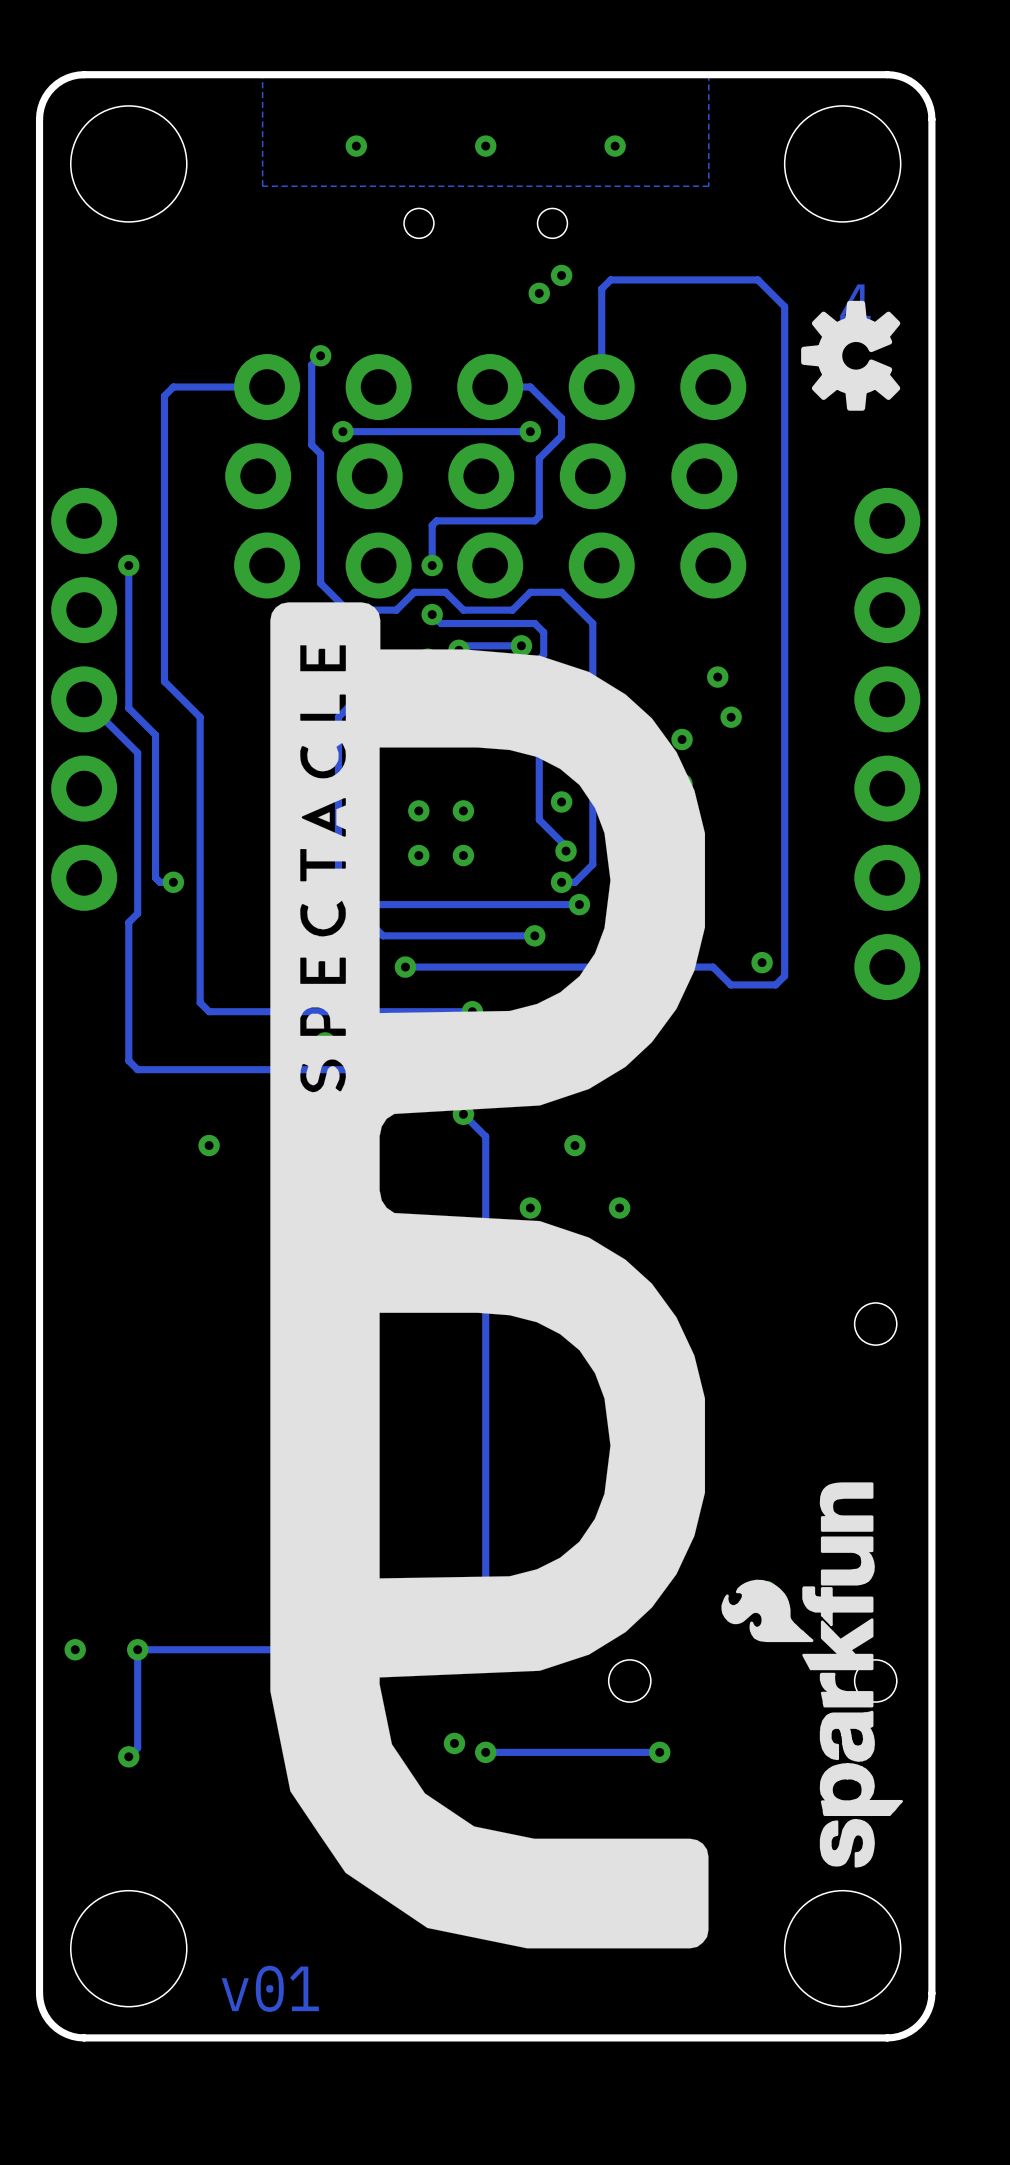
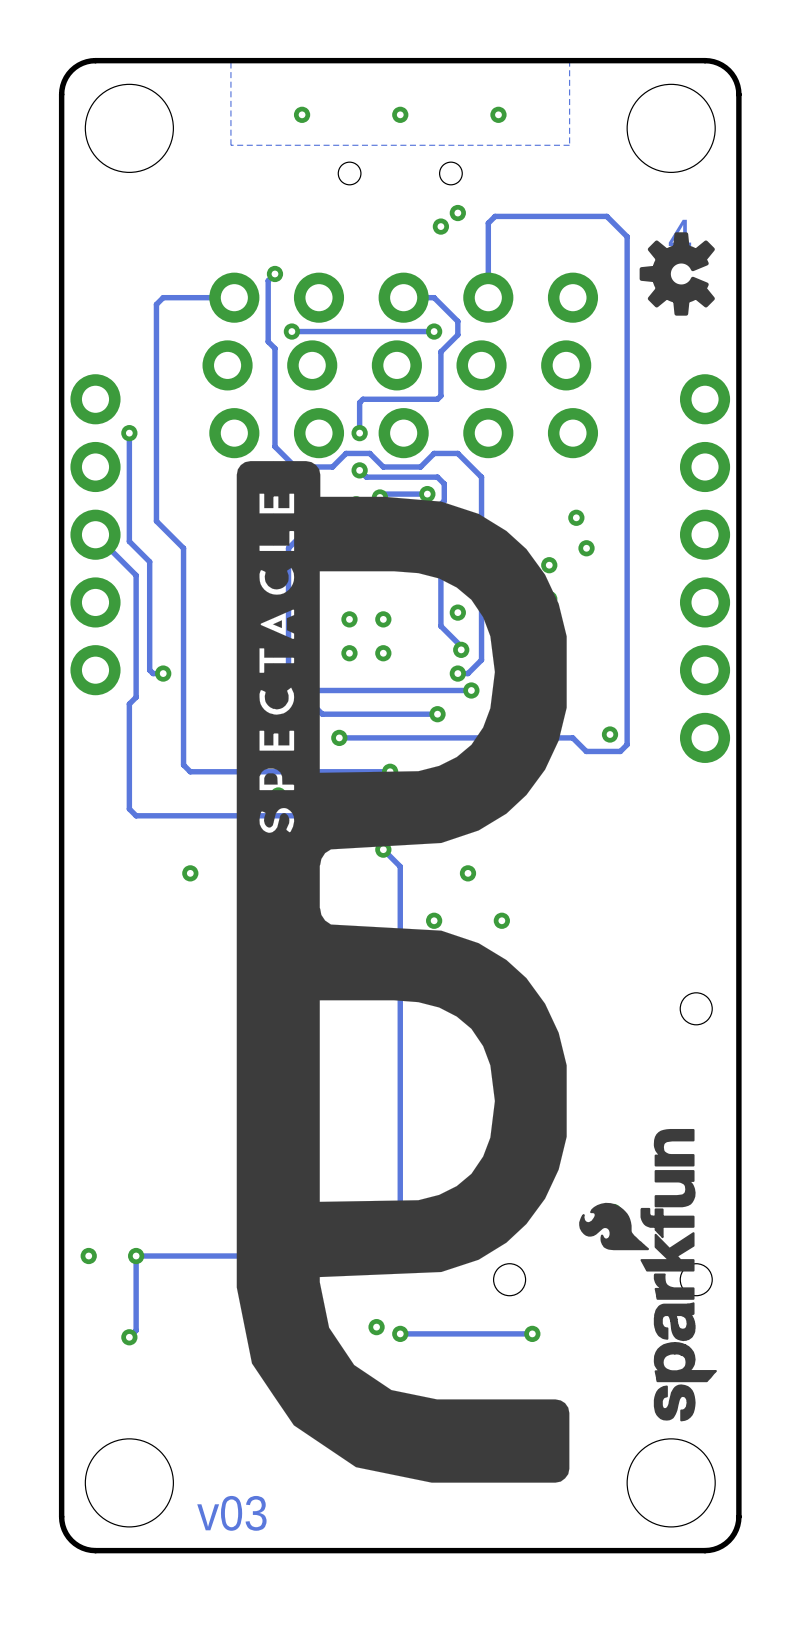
text: v01 (270, 1988) -> v03 (231, 1513)

